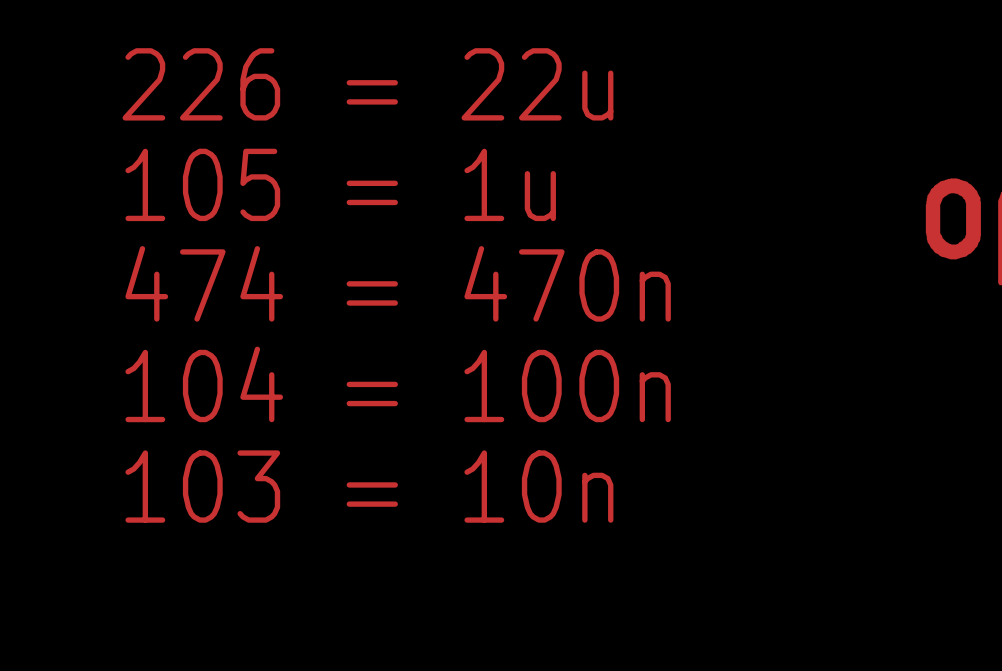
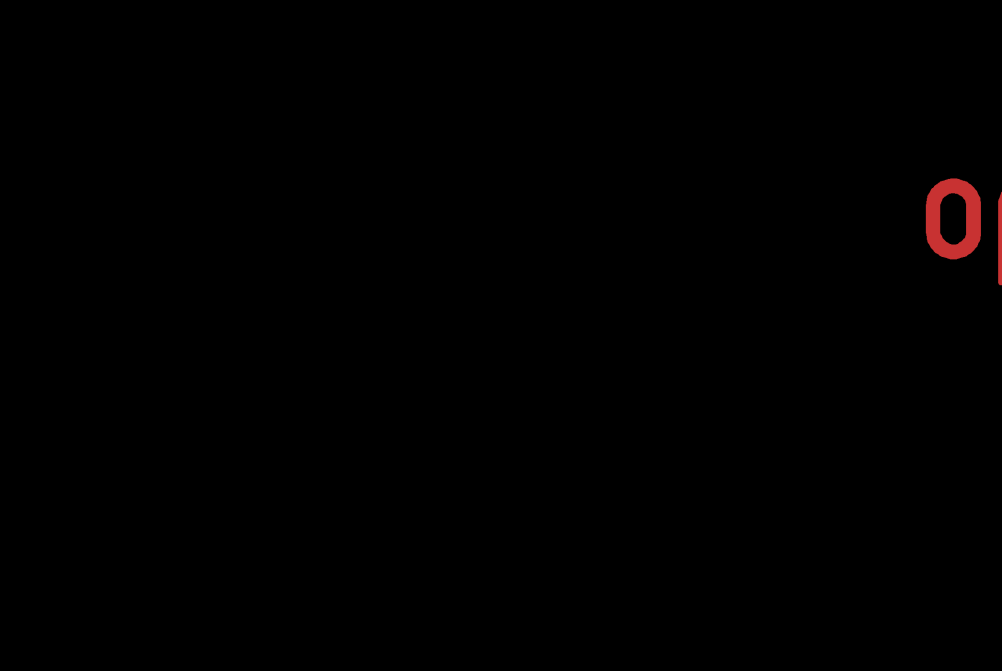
text: 226 = 22u (367, 84) -> none
text: 105 = 1u (340, 184) -> none
text: 474 = 470n (398, 283) -> none
text: 104 = 100n (398, 384) -> none
text: 103 = 10n (369, 486) -> none

